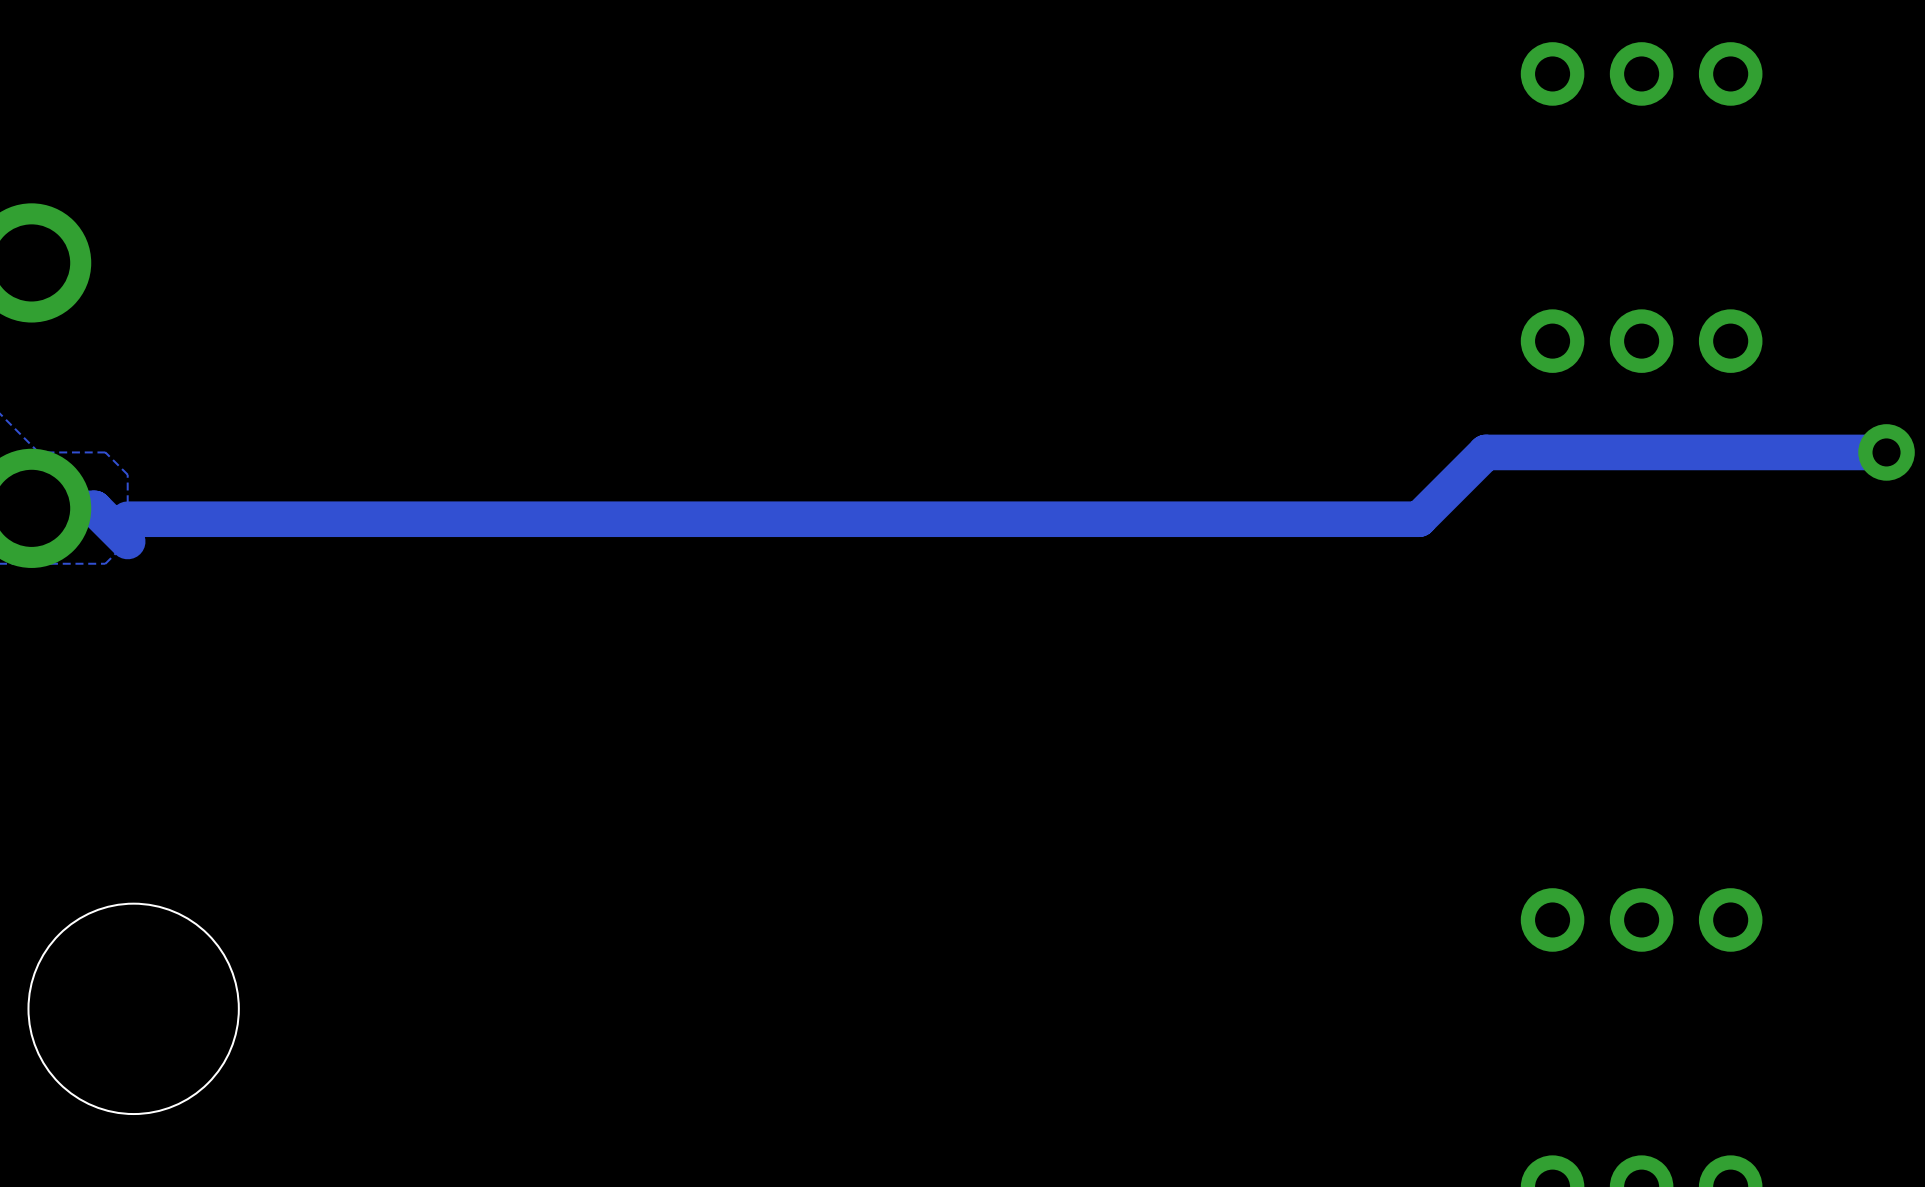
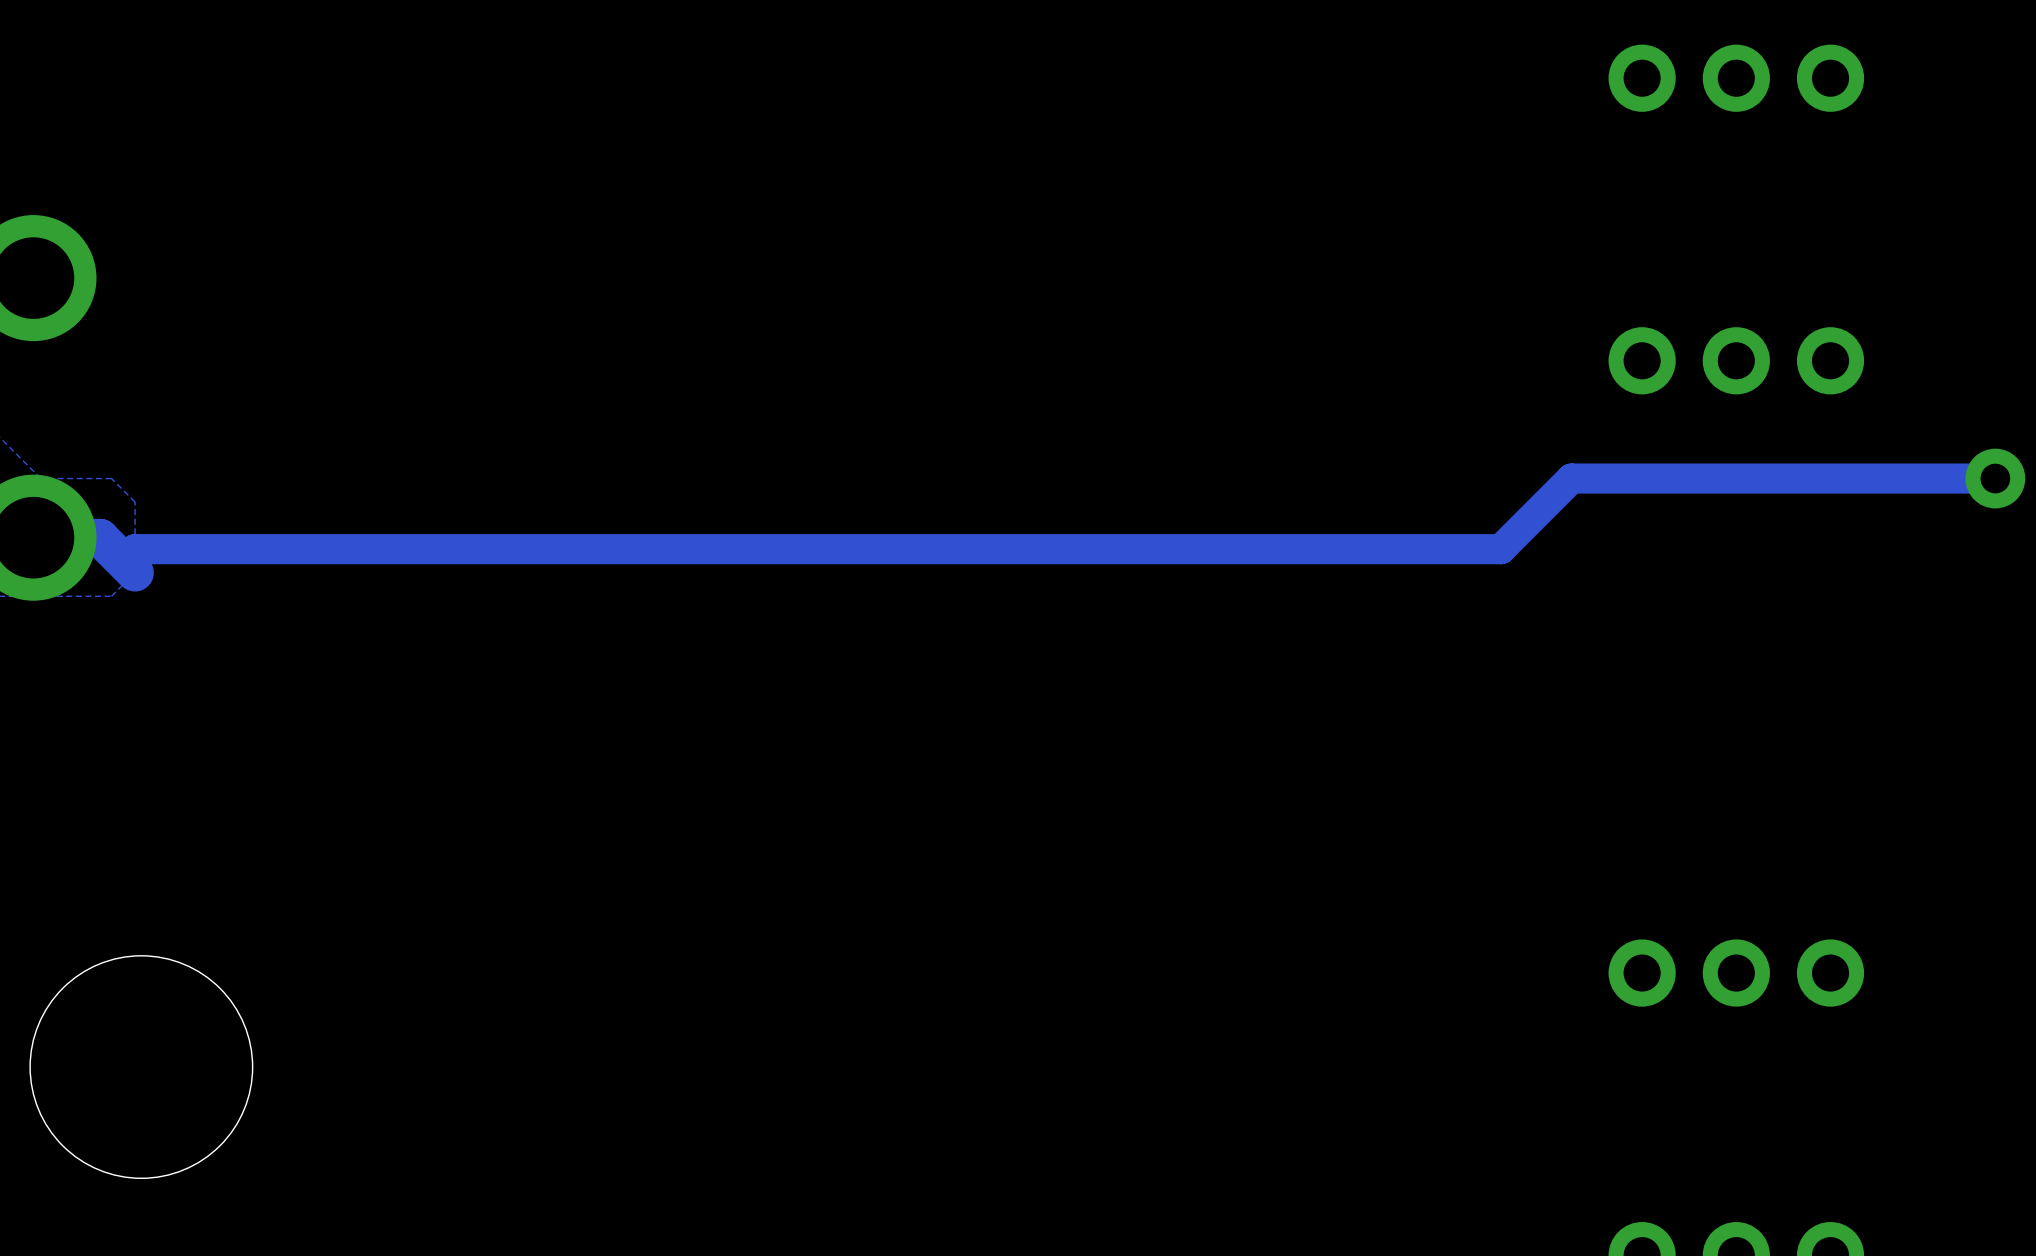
track width: thick (1886, 452) (1485, 452) (1418, 519) (127, 519) -> thin (1995, 478) (1571, 478) (1500, 549) (135, 549)

